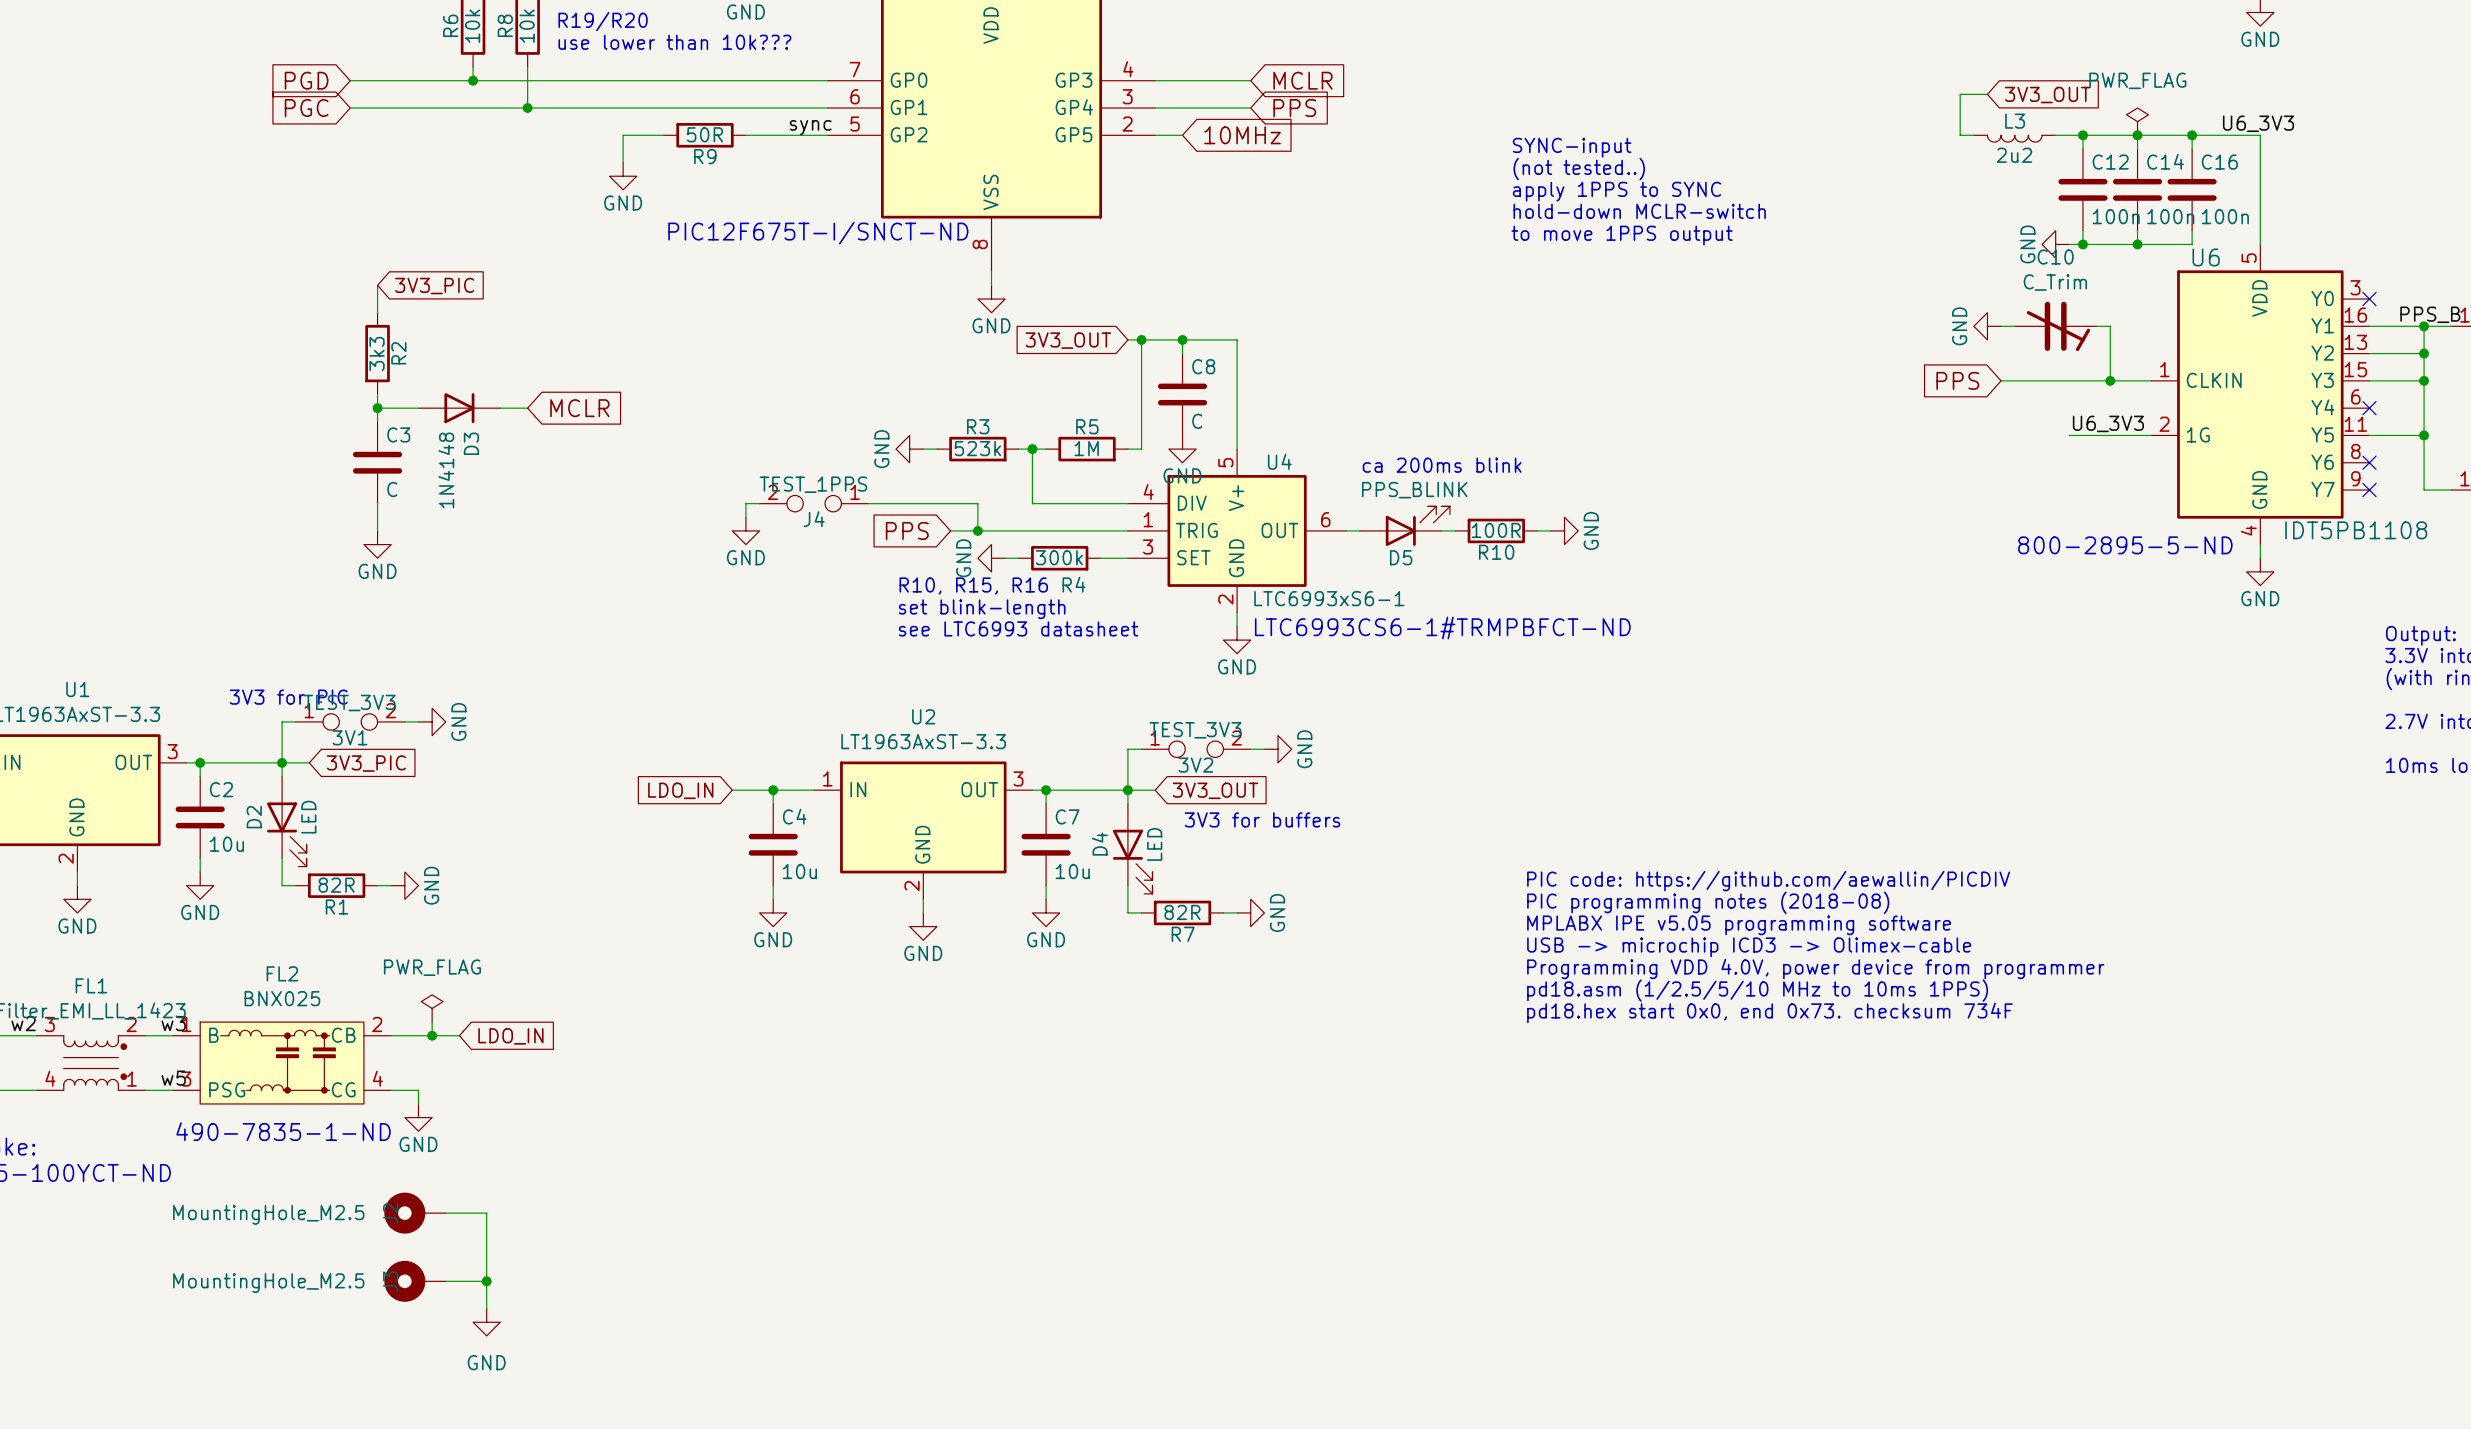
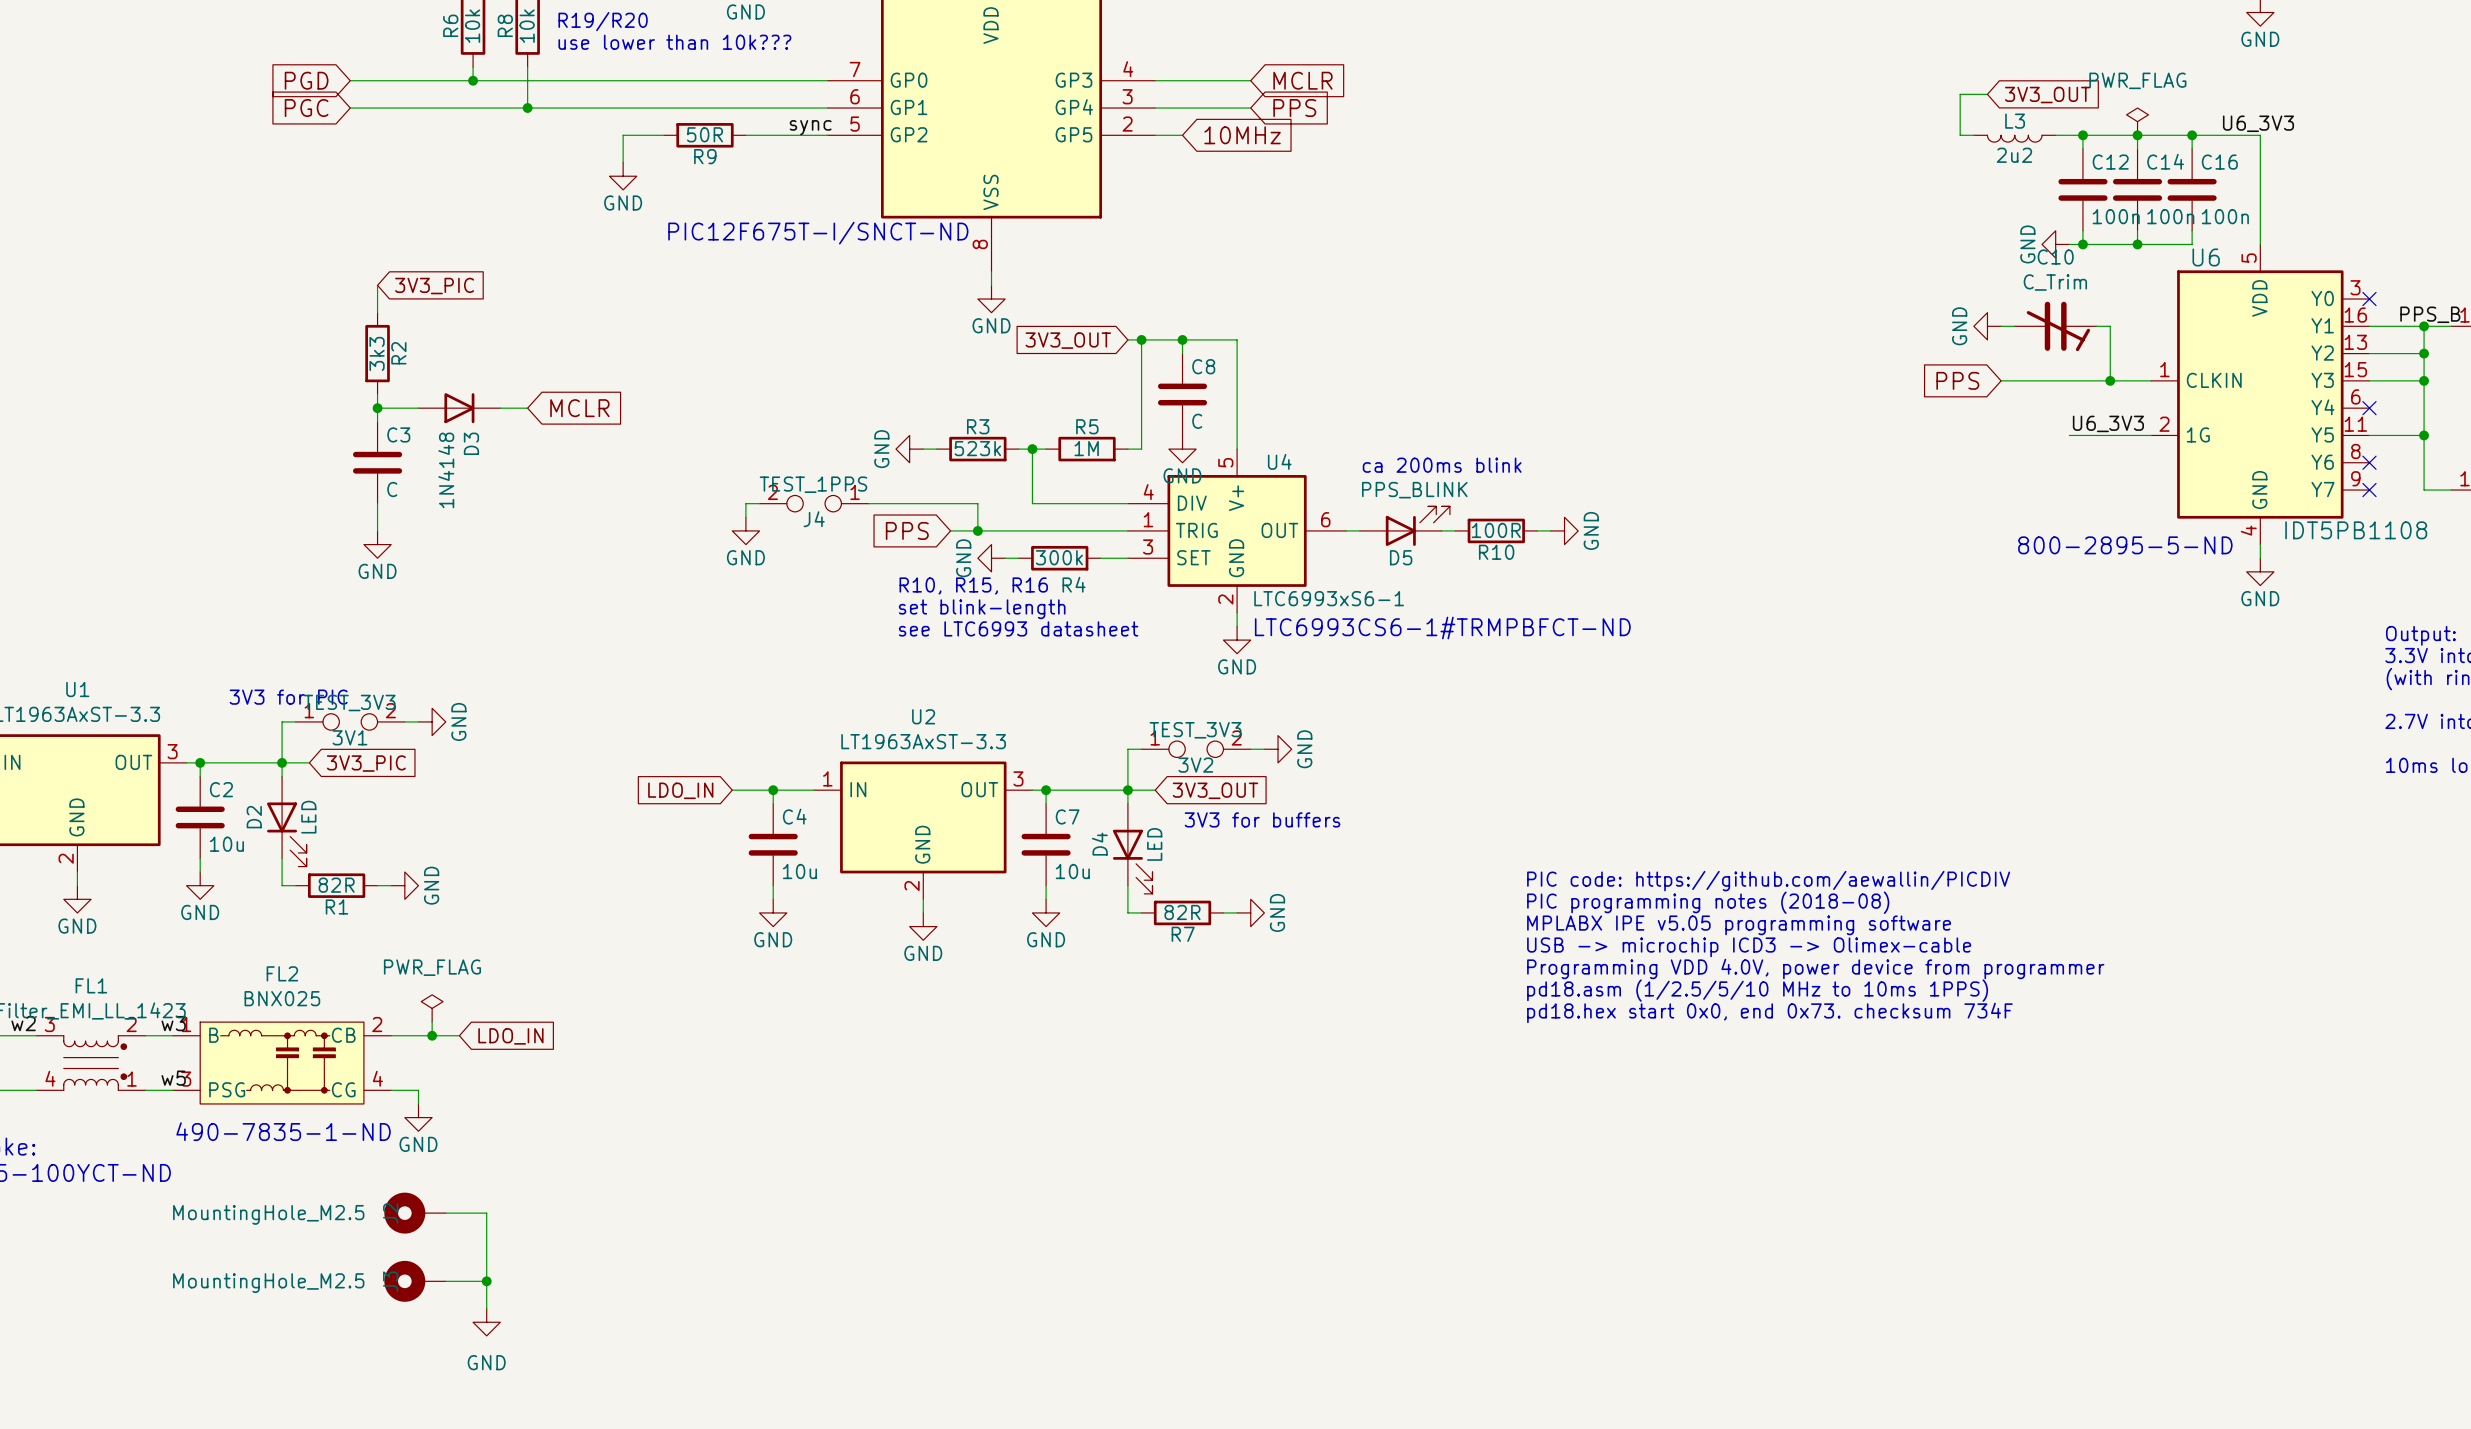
text: SYNC-input (1572, 147) -> none
text: (not tested..) (1579, 168) -> none
text: apply 1PPS to SYNC (1616, 191) -> none
text: hold-down MCLR-switch (1639, 211) -> none
text: to move 1PPS output (1622, 235) -> none

